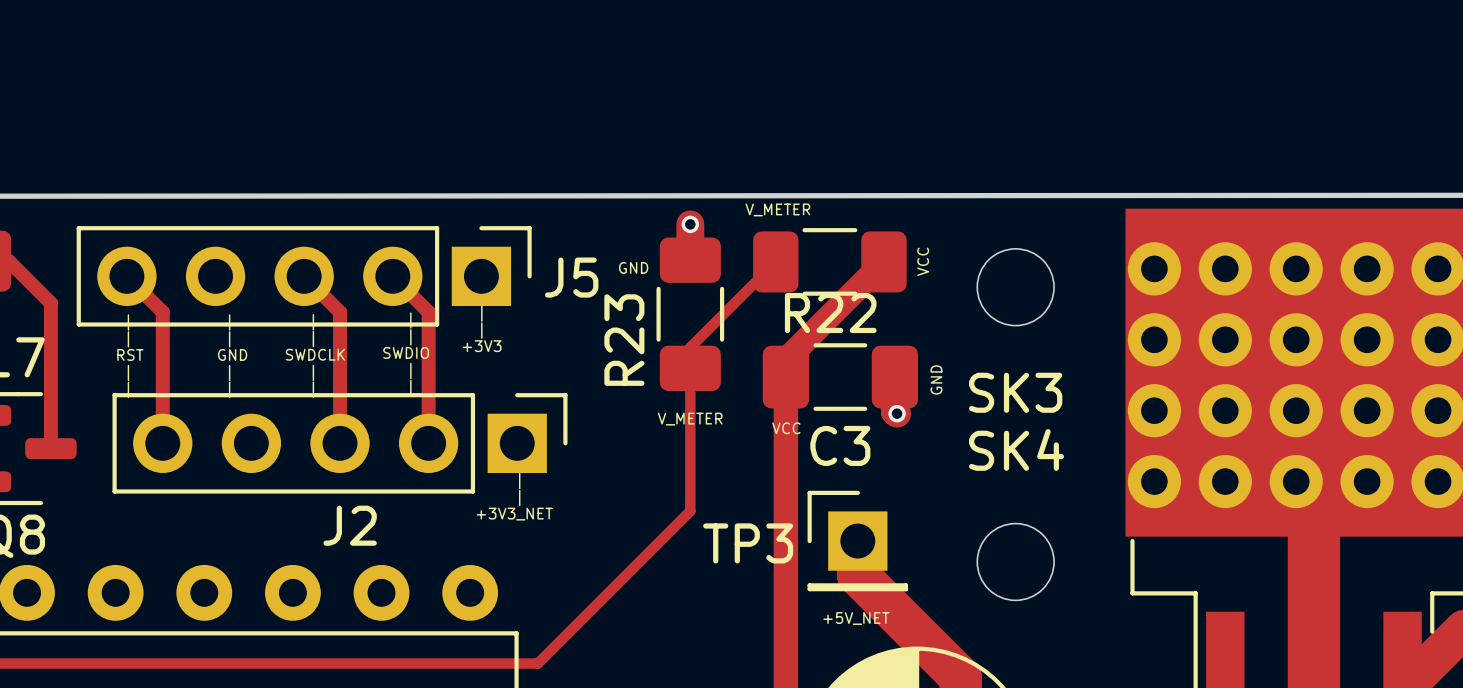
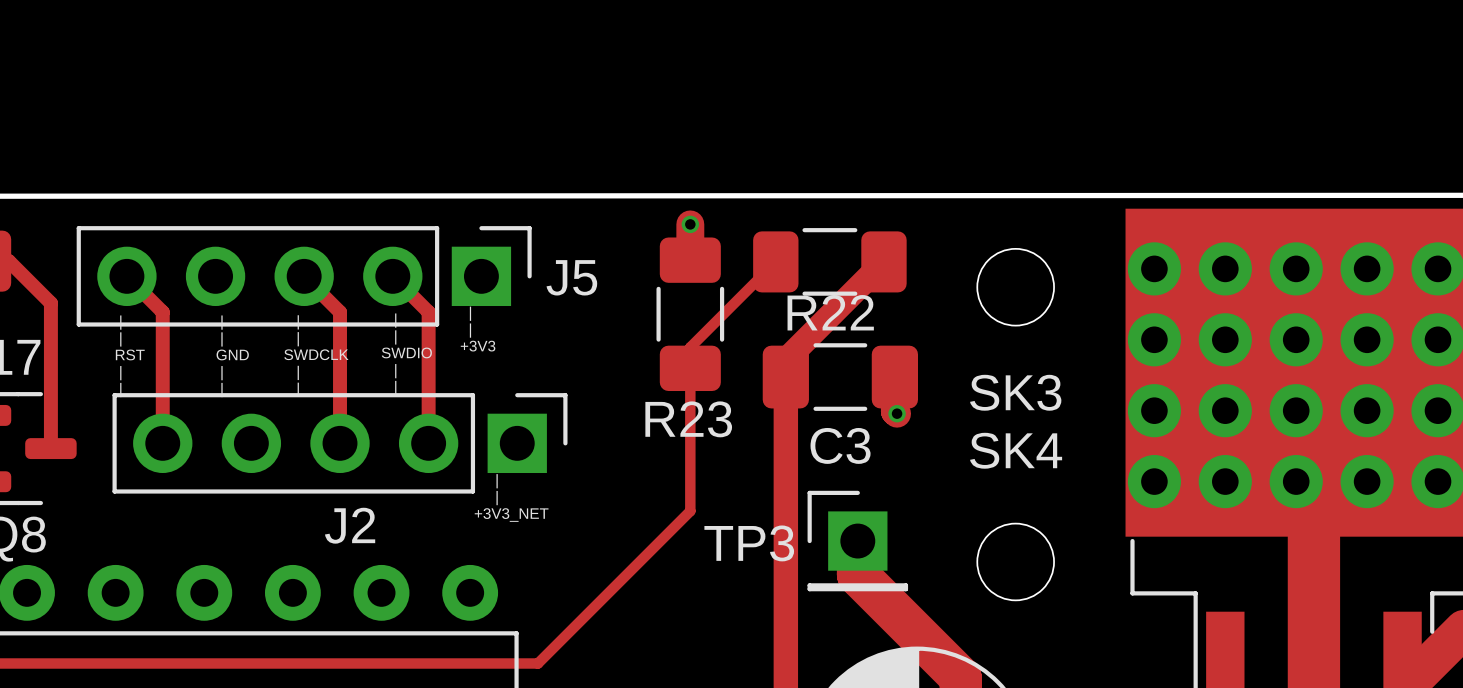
text: V_METER (777, 209) -> none
text: VCC (923, 261) -> none
text: GND (633, 267) -> none
R23 name rotation: 0° (624, 340) -> 90° clockwise (688, 419)
text: GND (936, 379) -> none
text: V_METER (690, 419) -> none
text: VCC (786, 428) -> none
text: +5V_NET (856, 618) -> none

